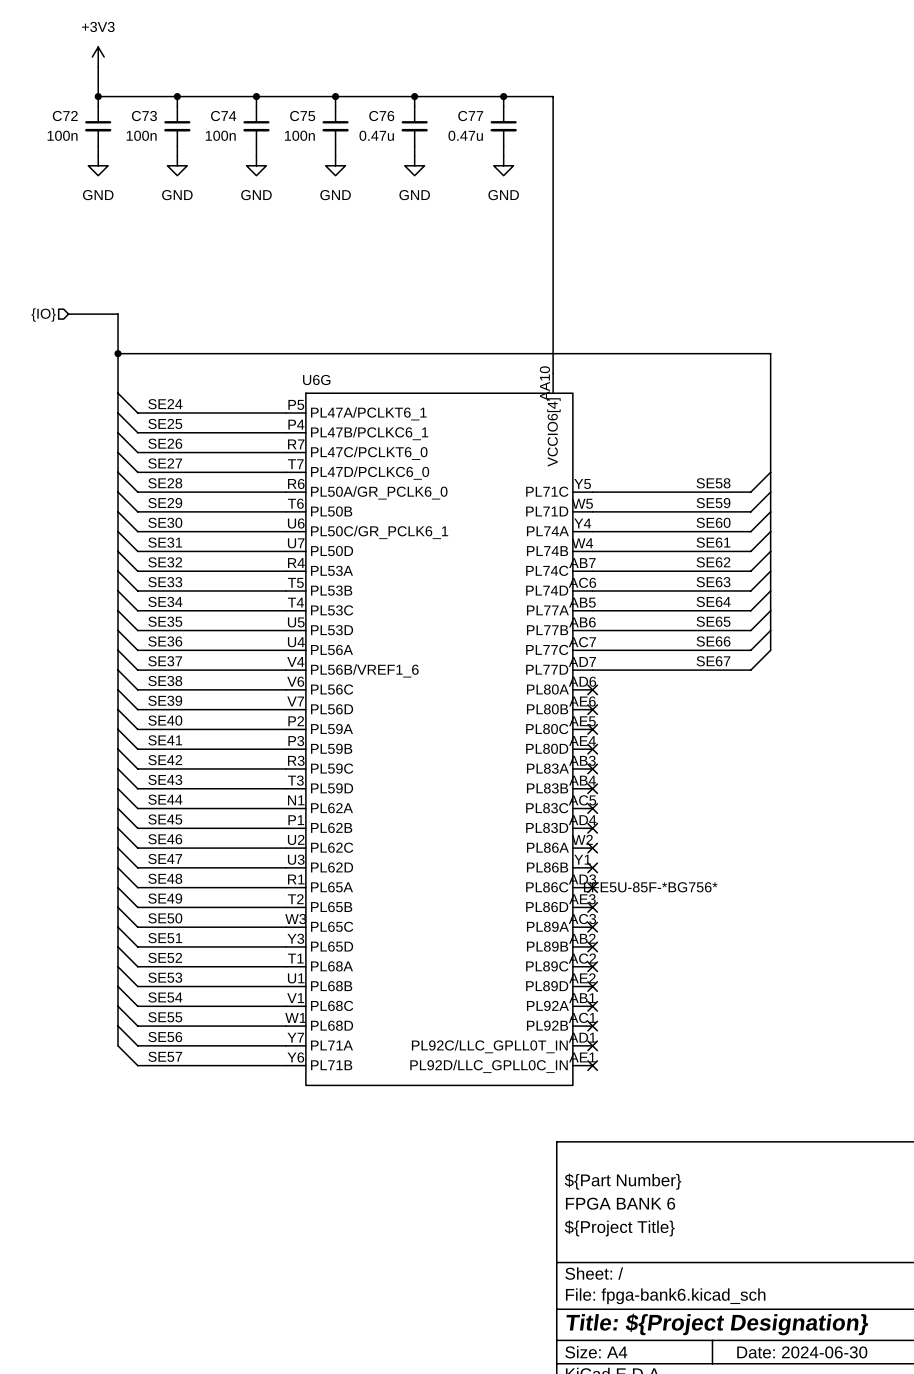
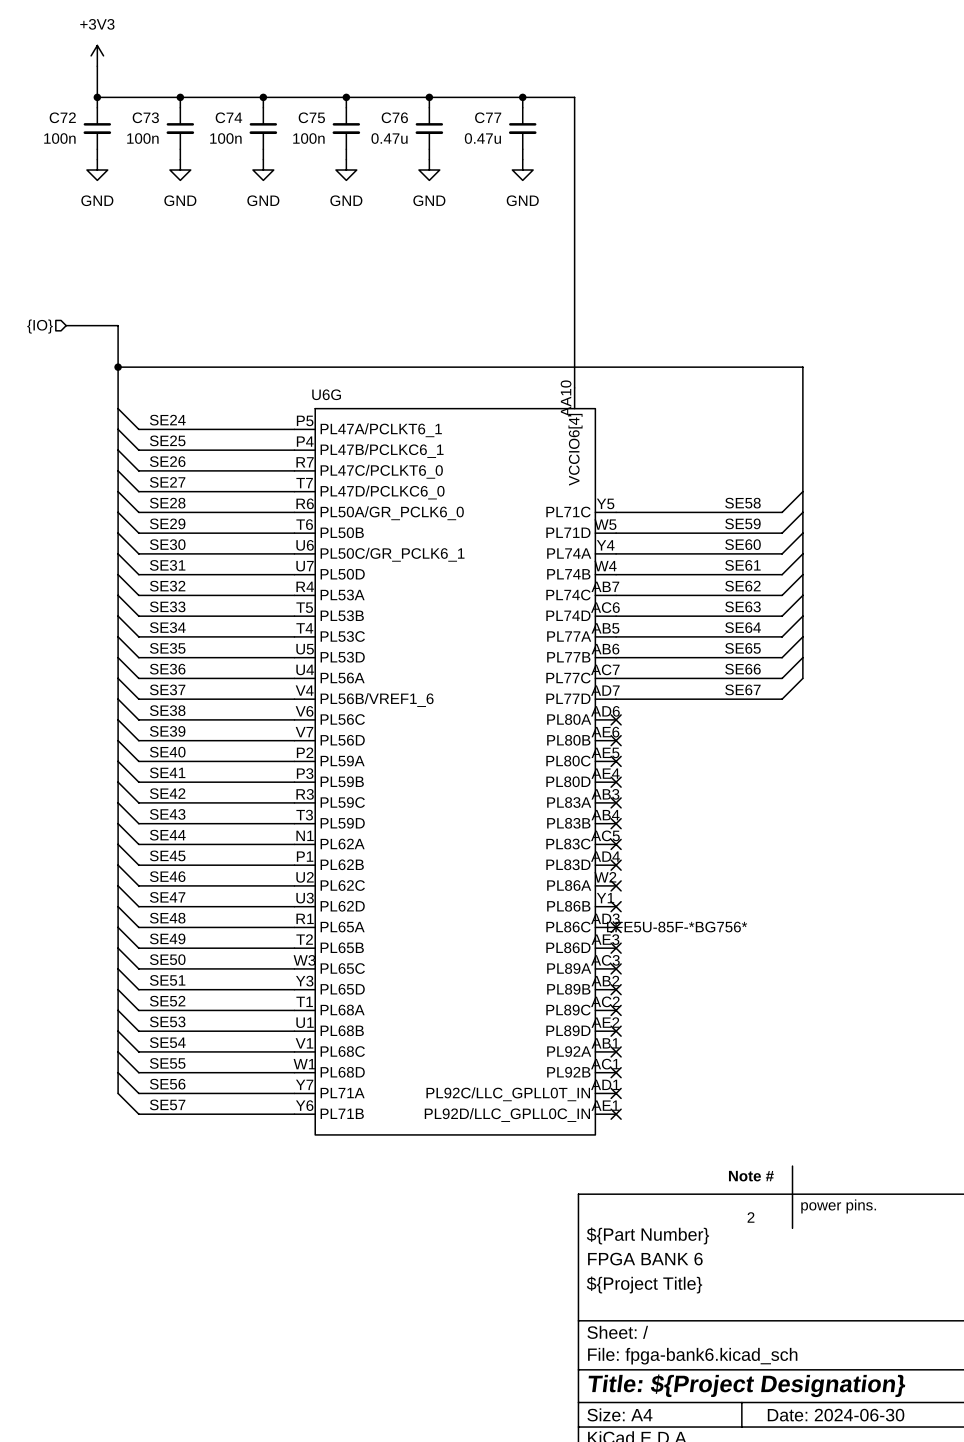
line: none -> (792, 1166) (792, 1228)
text: none -> Note # (751, 1176)
text: none -> power pins. (838, 1206)
text: none -> 2 (751, 1217)

